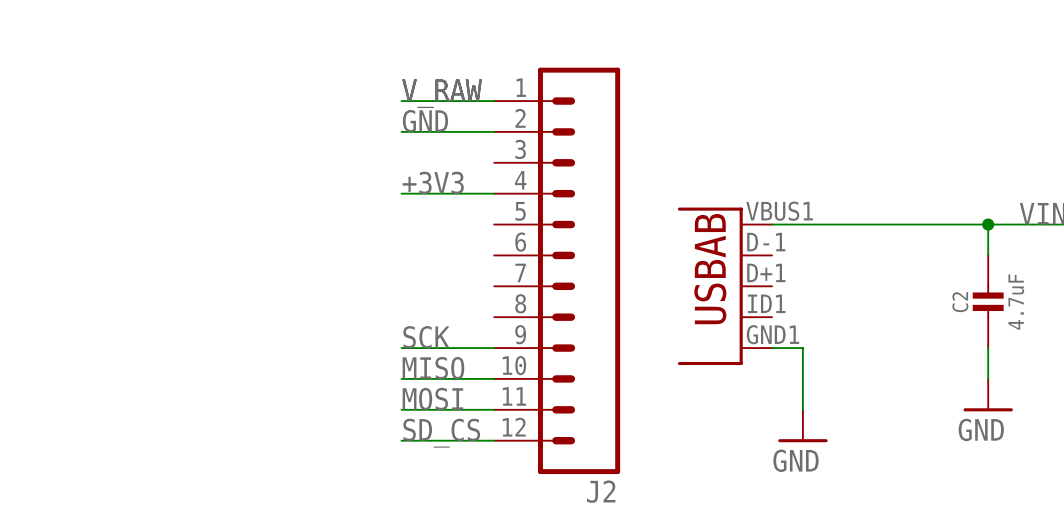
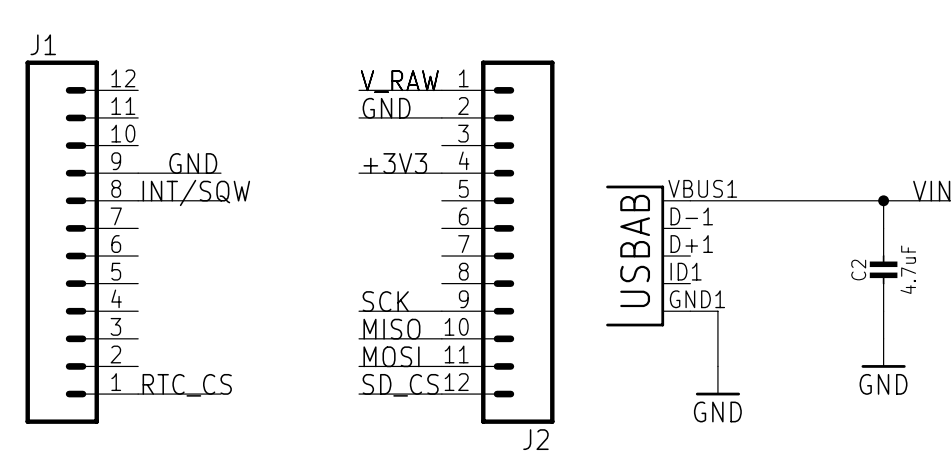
label: none -> GND (193, 163)
wire: none -> (138, 173) (220, 173)
label: none -> INT/SQW (196, 192)
wire: none -> (138, 200) (220, 200)
J1: none -> (81, 242)
label: none -> RTC_CS (187, 385)
wire: none -> (138, 394) (220, 394)

